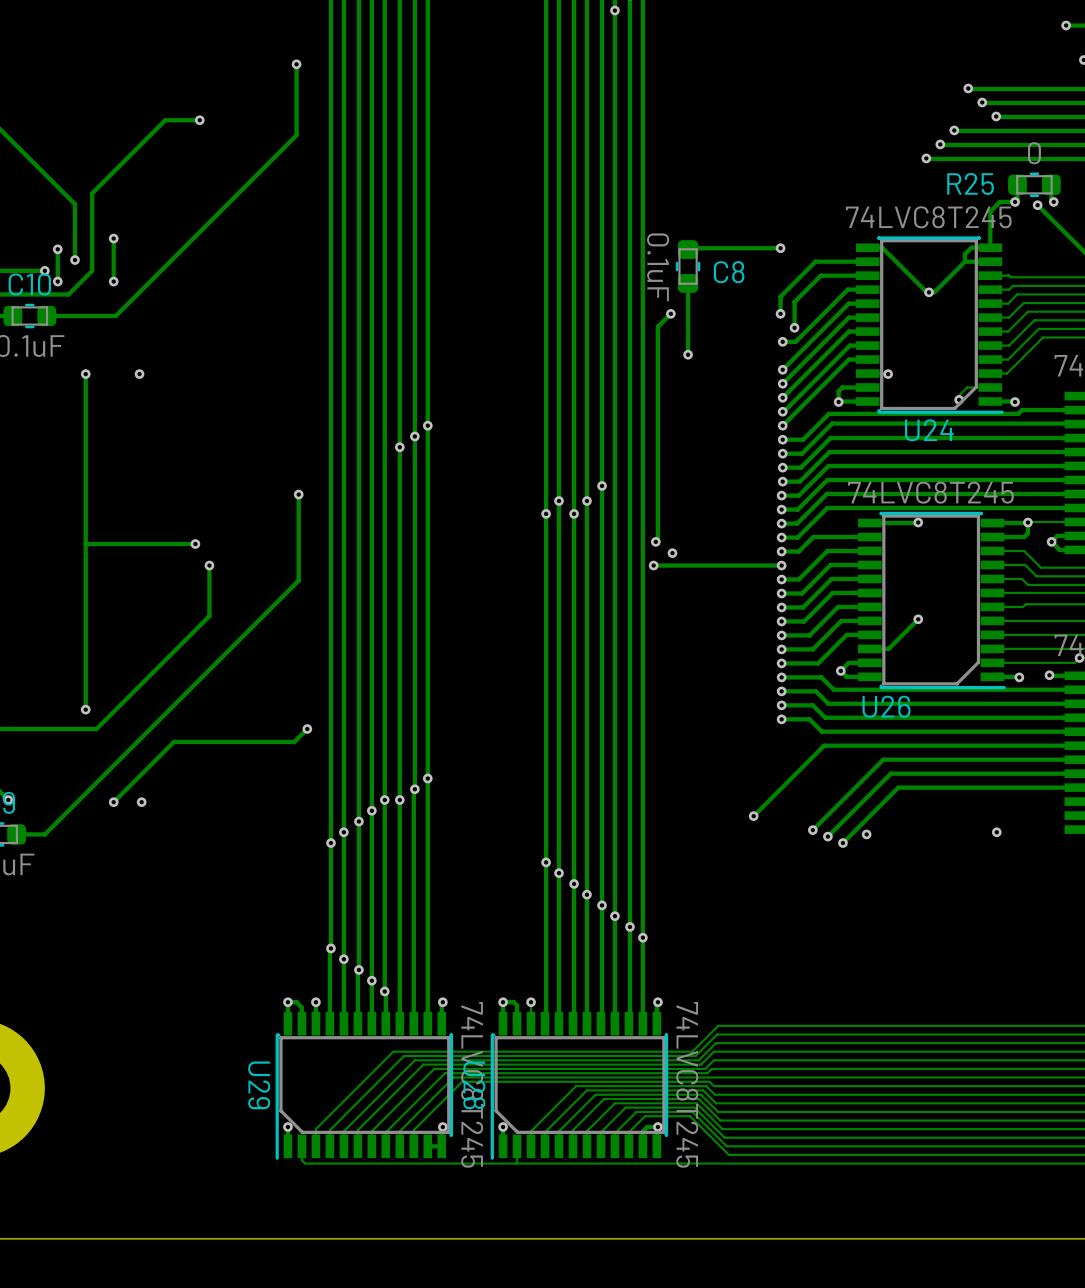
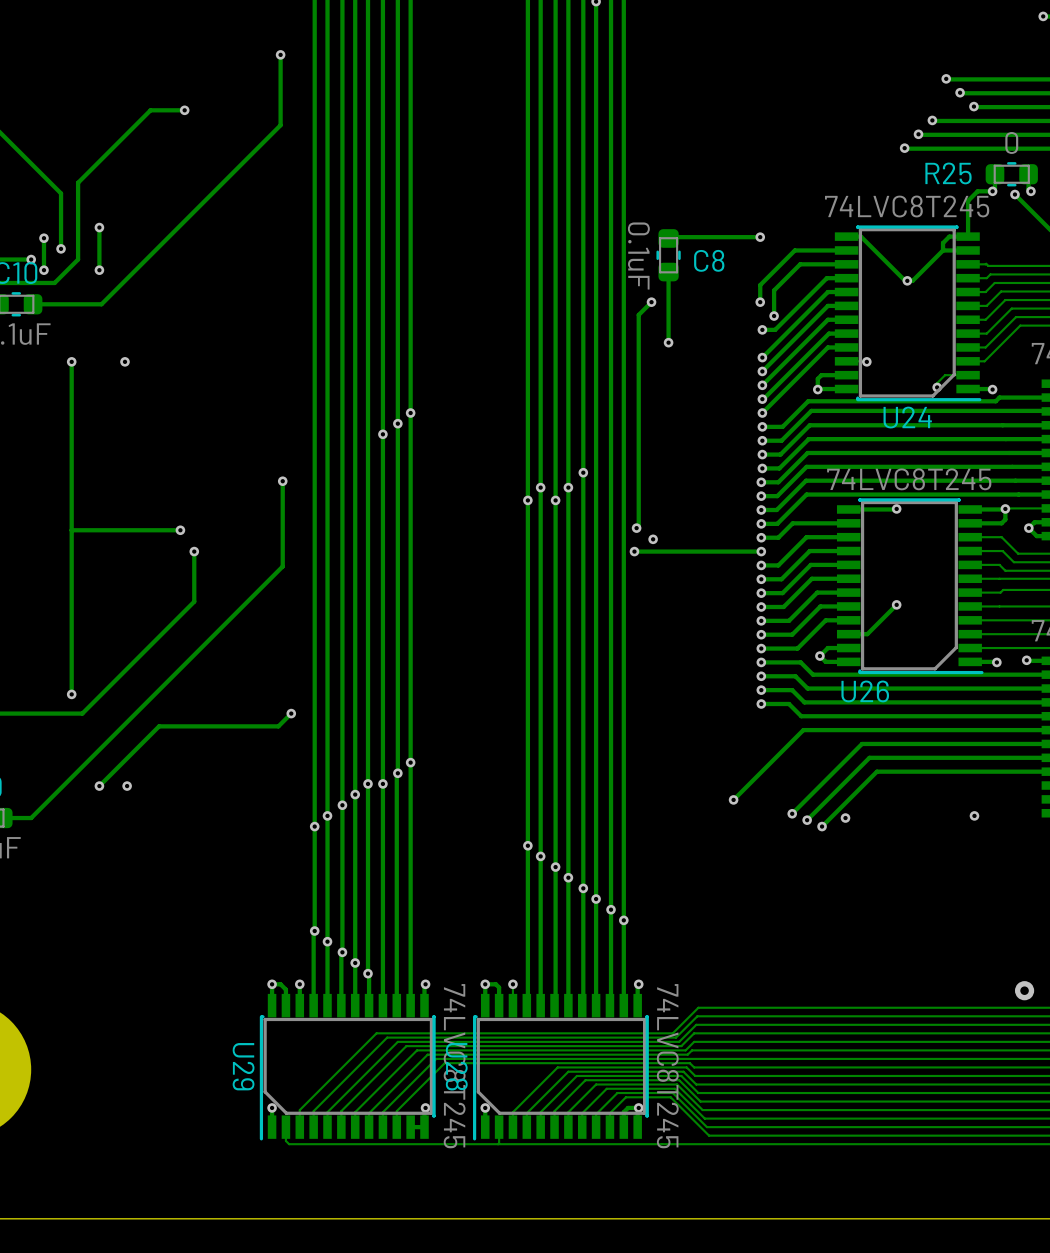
via: none -> (1024, 990)

